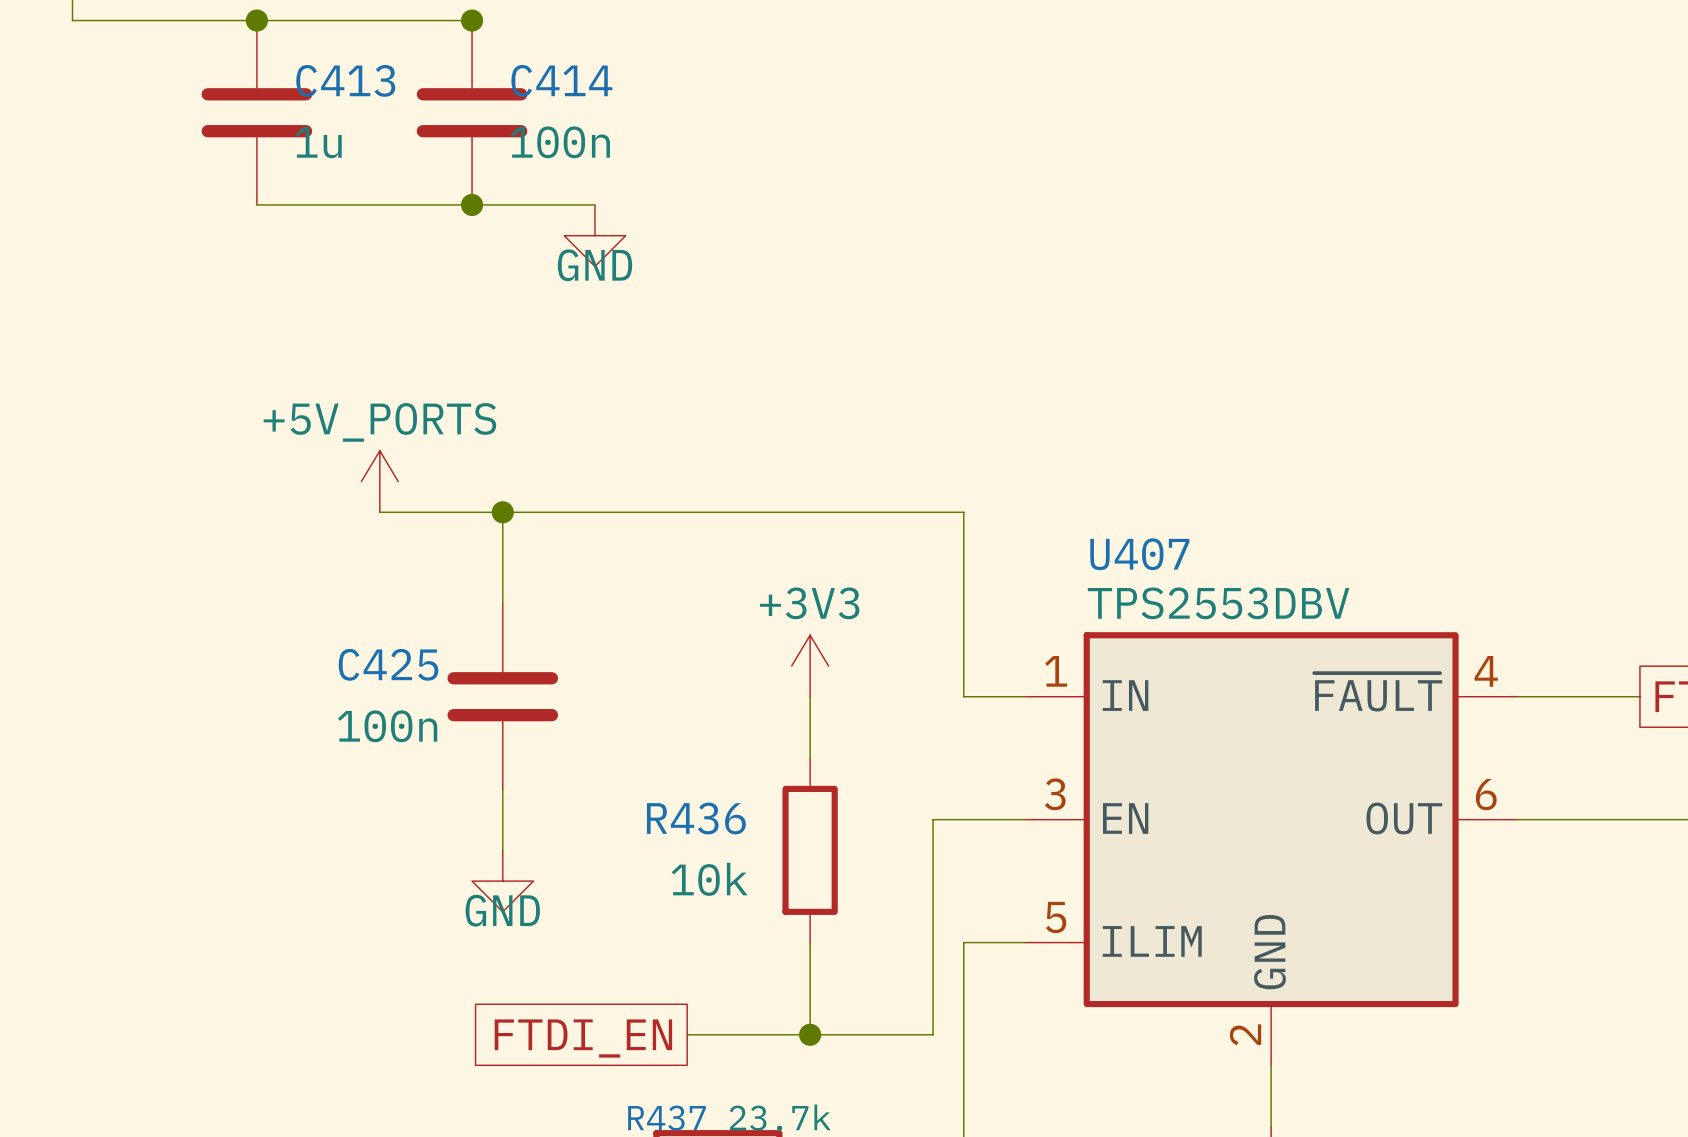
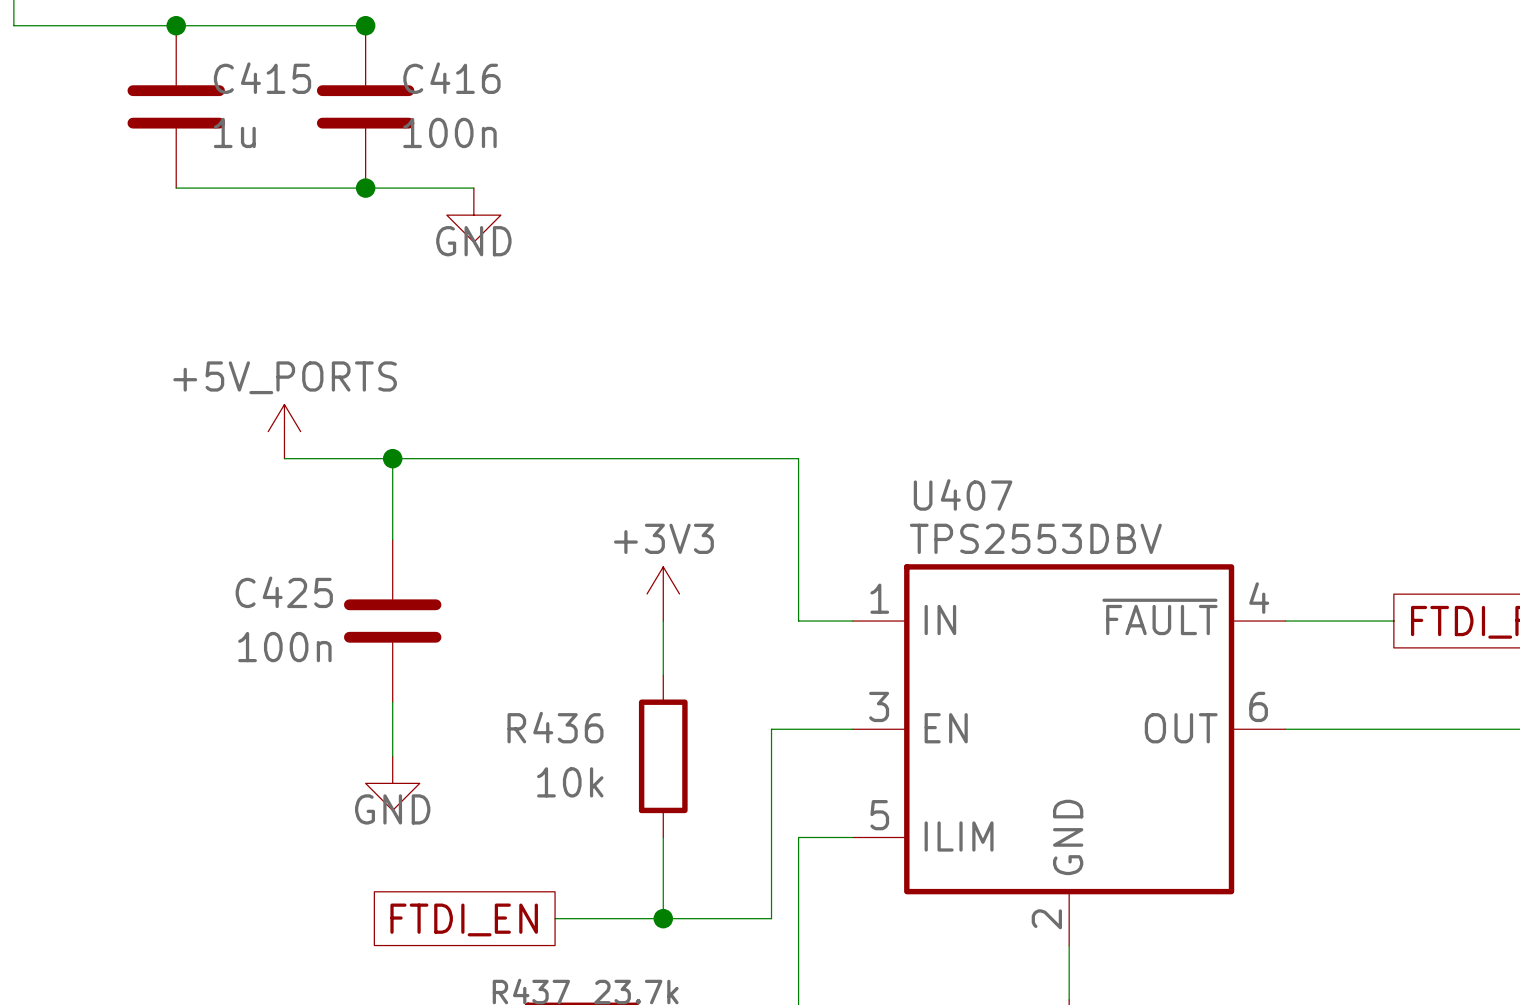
C413 name: C413 (345, 80) -> C415 (262, 78)
C414 name: C414 (561, 80) -> C416 (451, 78)

